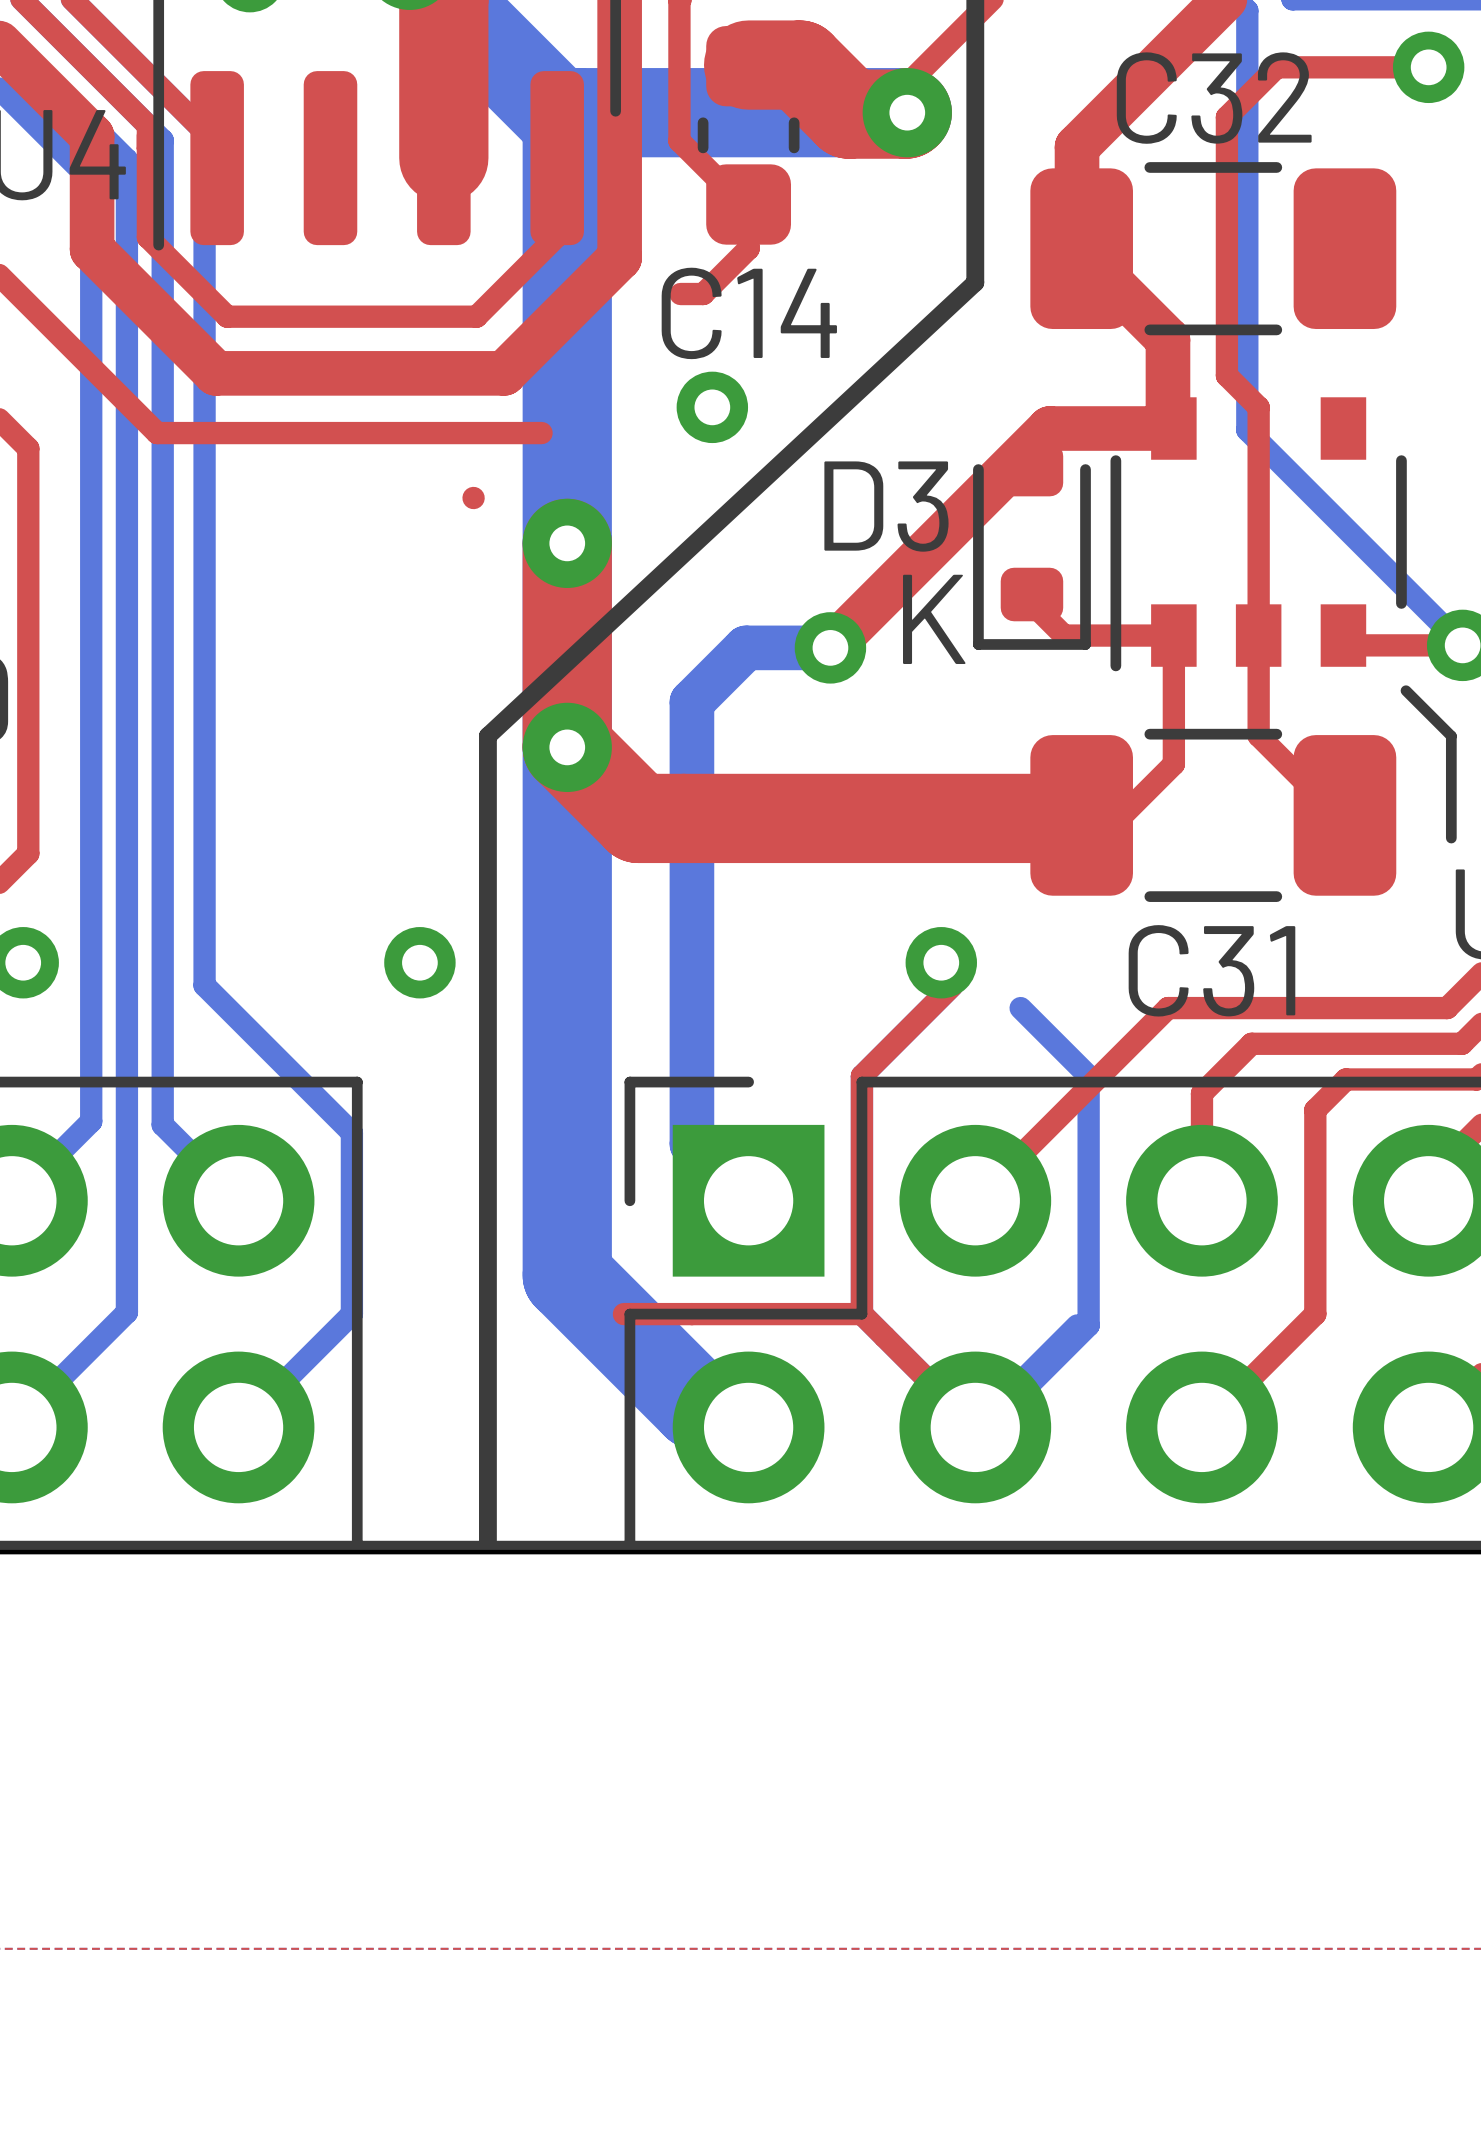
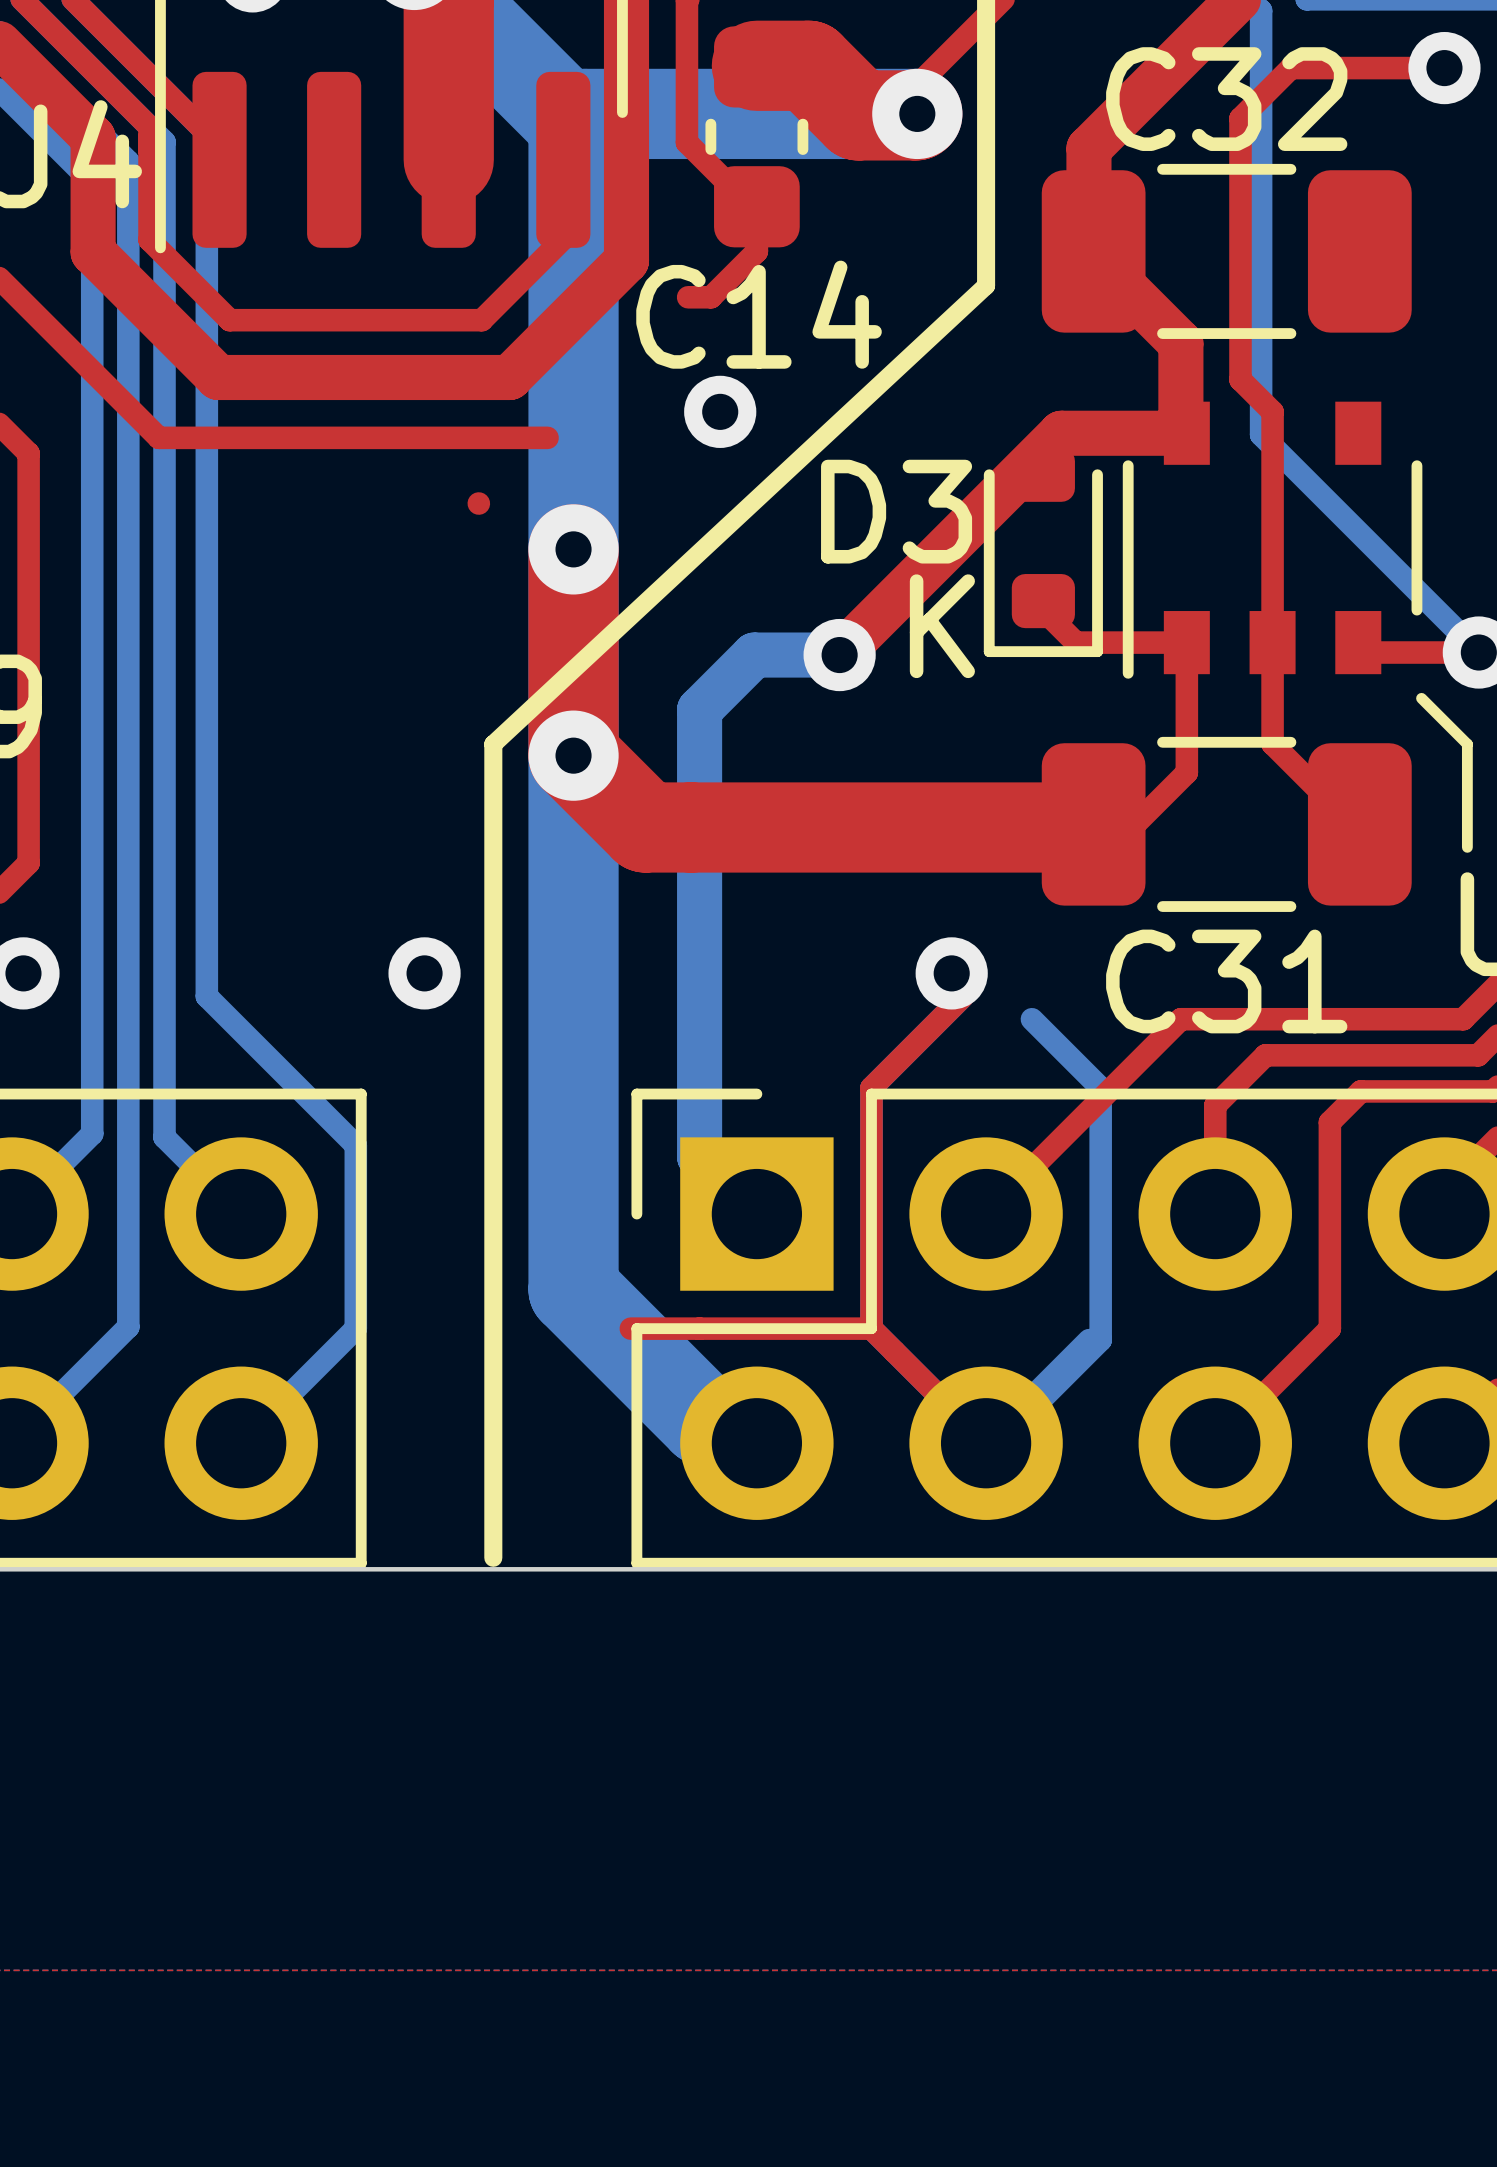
line: (357, 1546) (629, 1546) -> none

